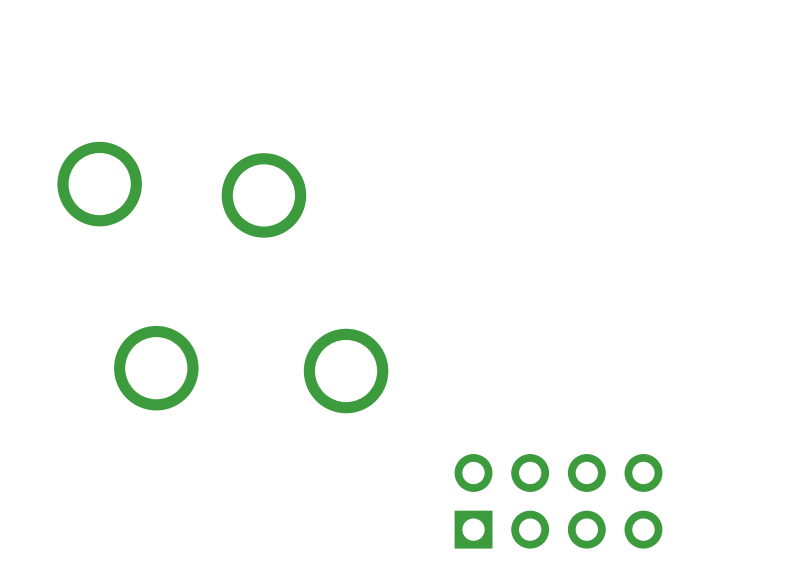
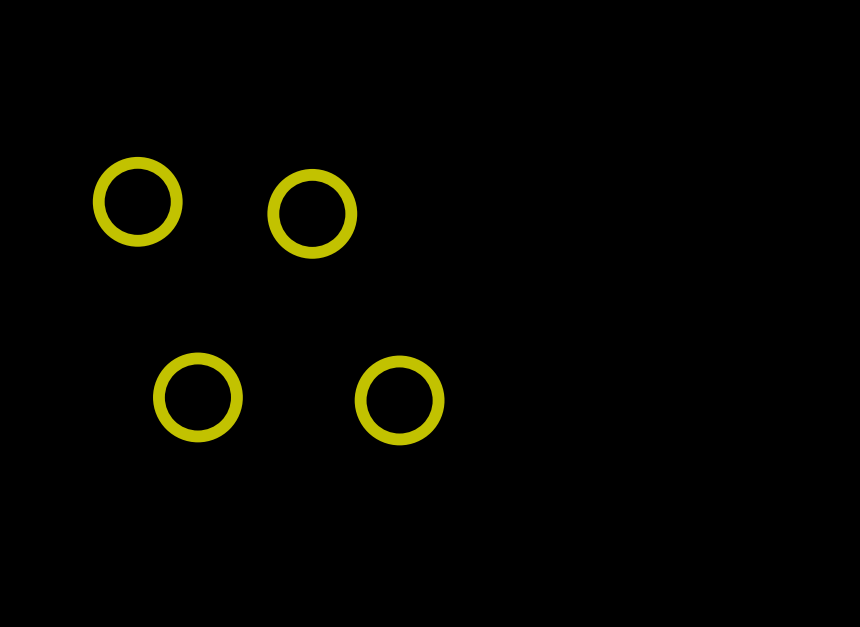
part: (558, 501) -> none

